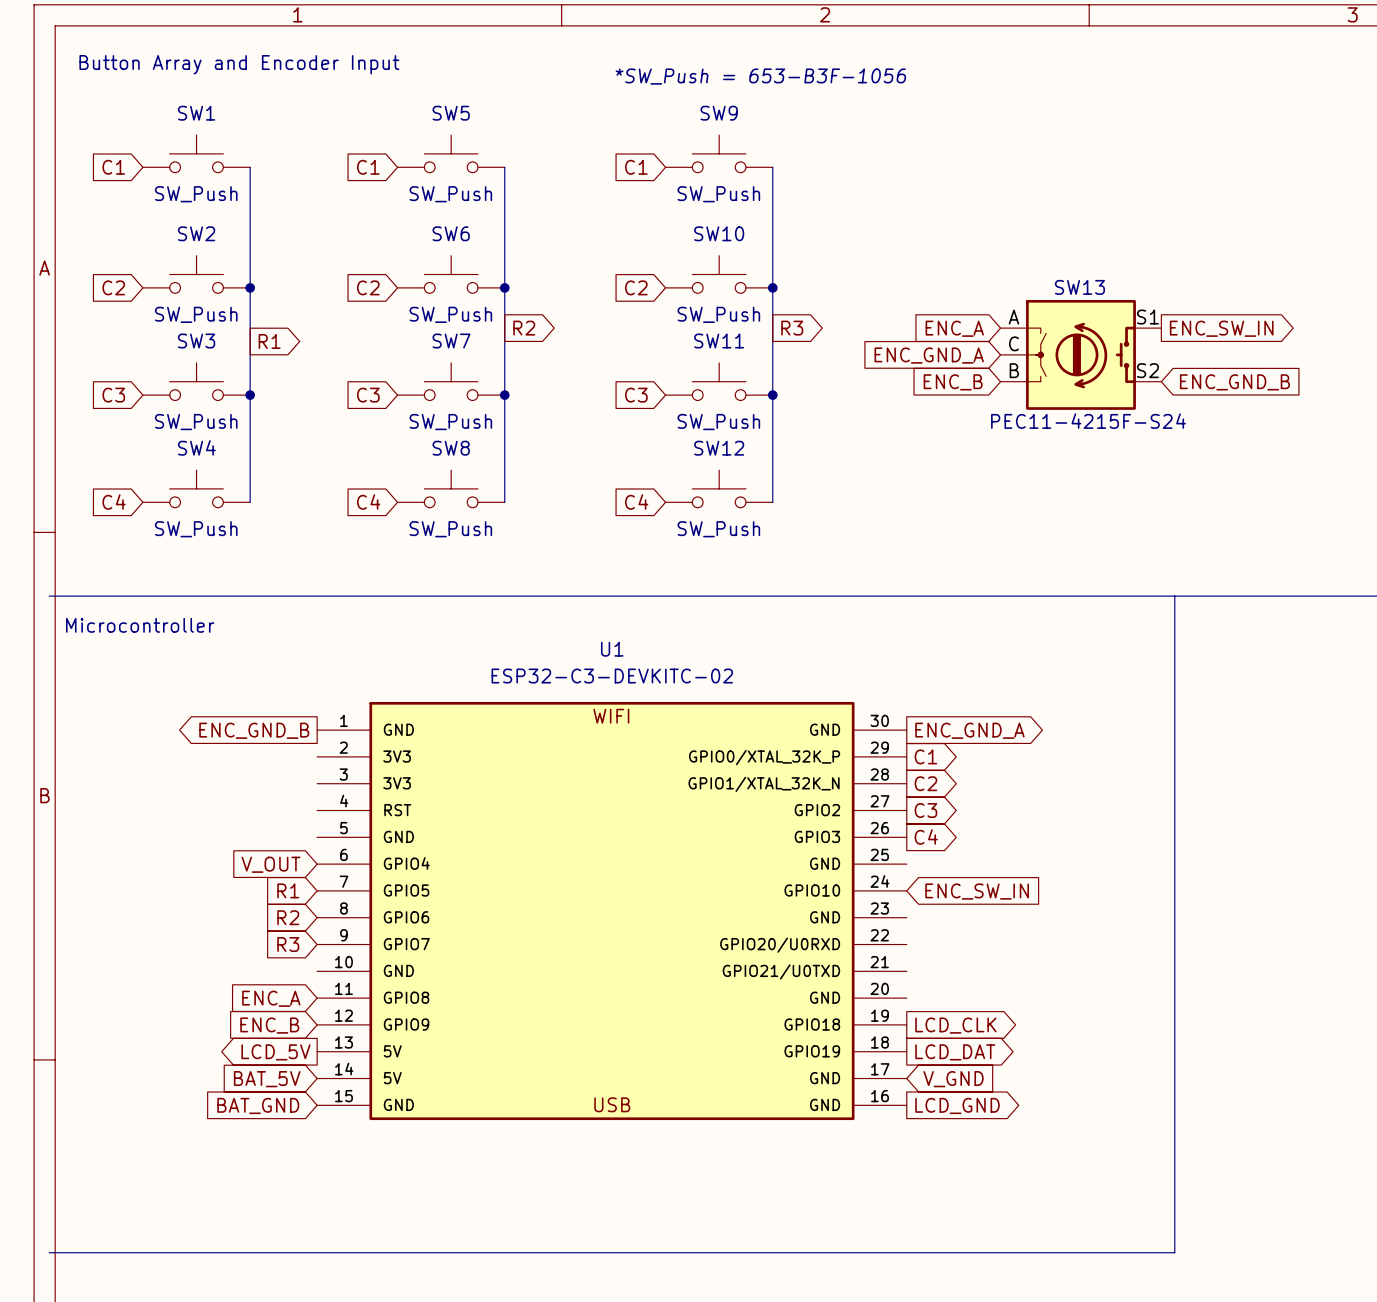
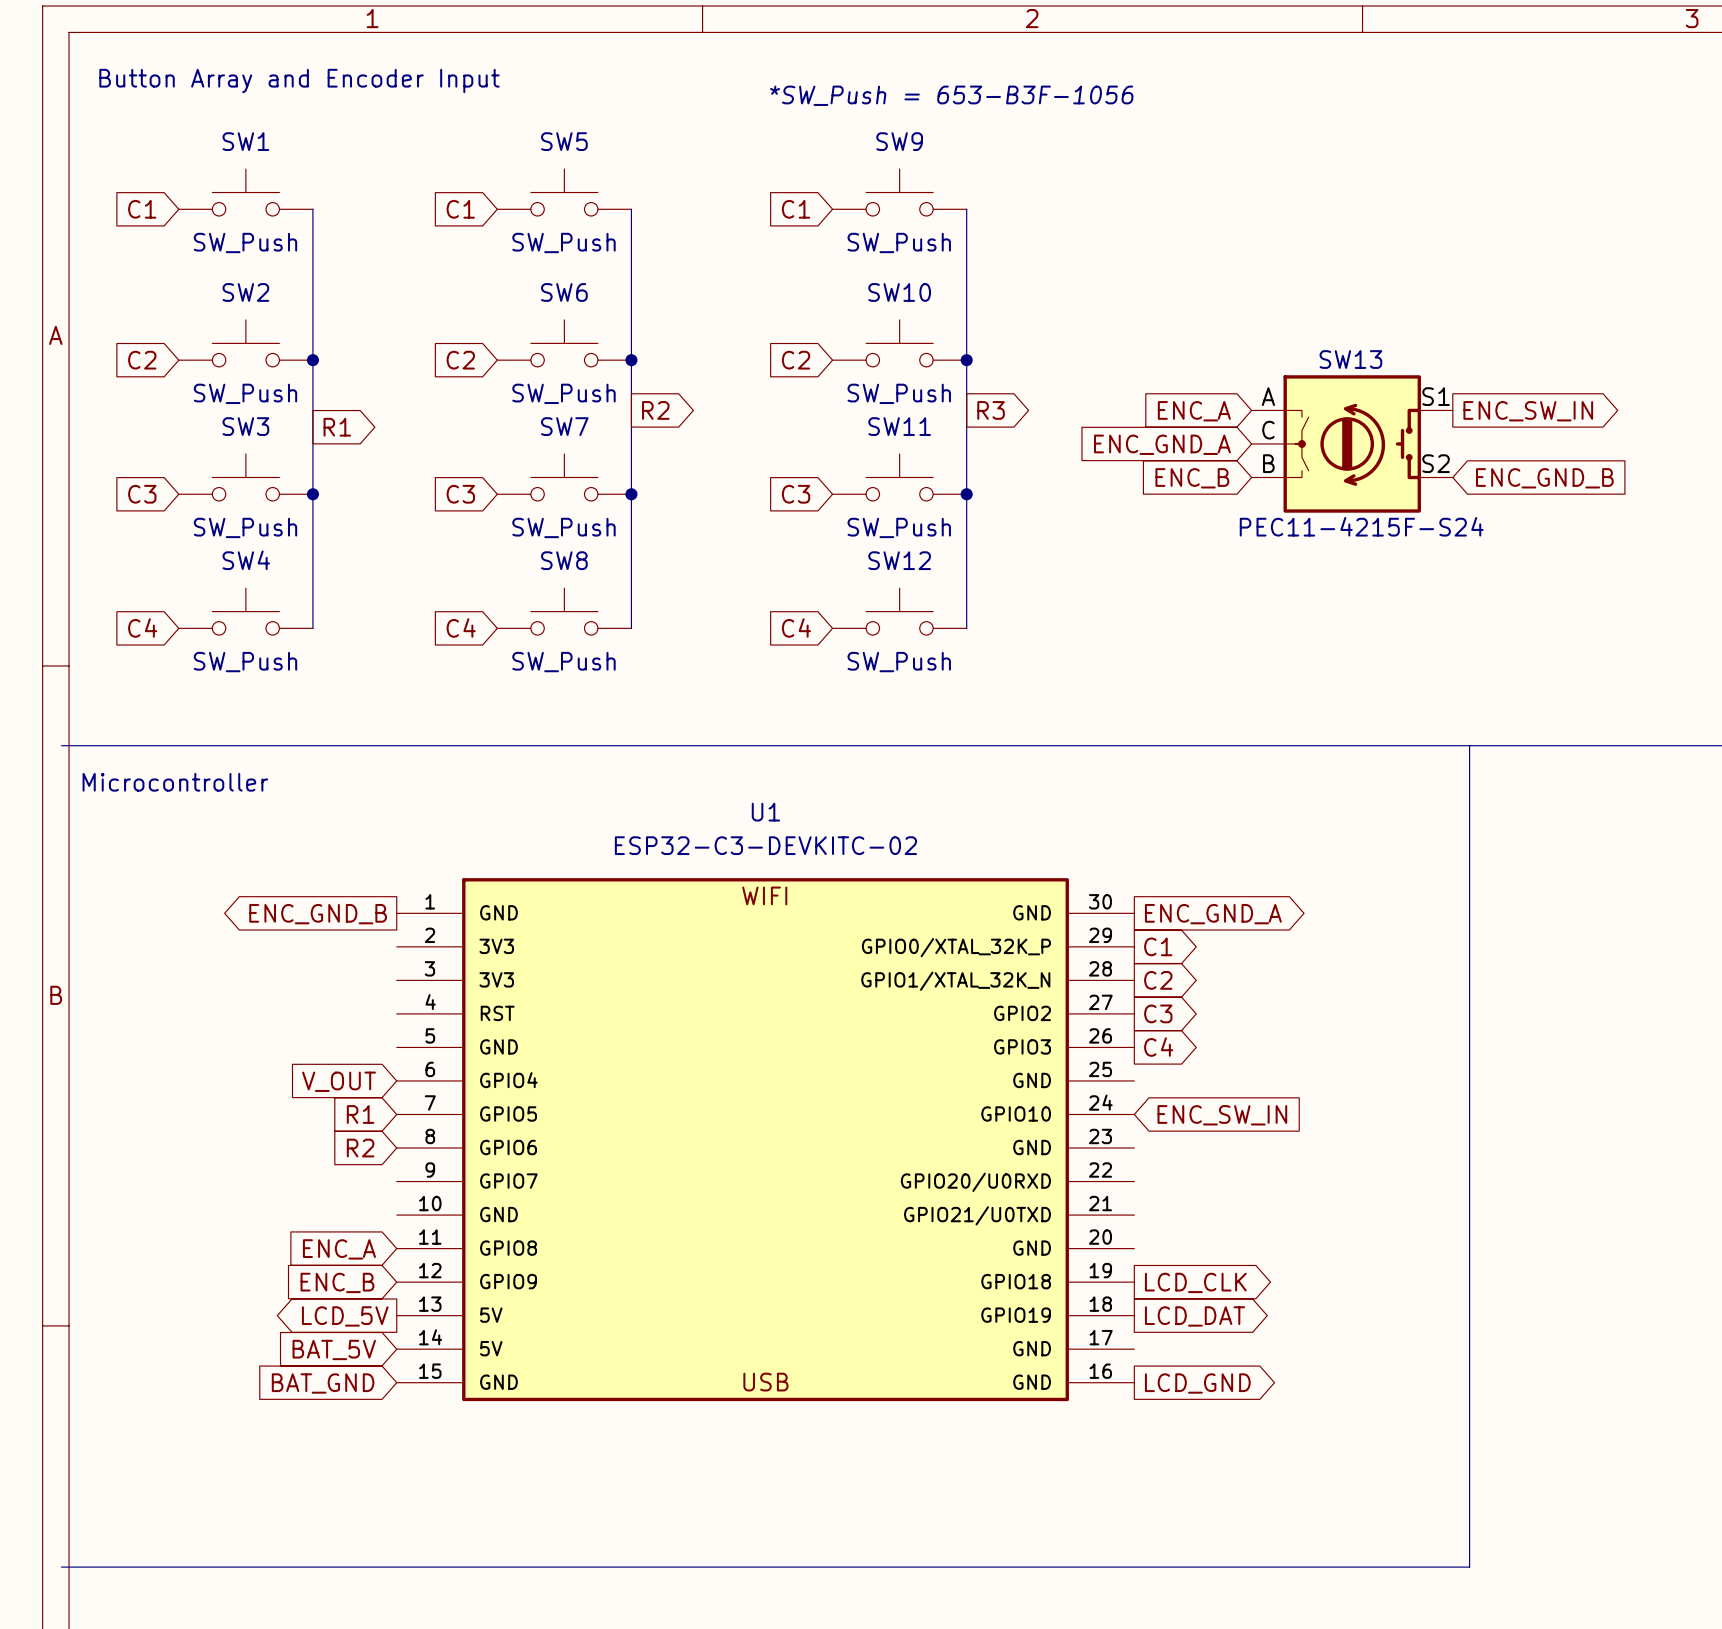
global label: R3 (288, 944) -> none
global label: V_GND (953, 1079) -> none

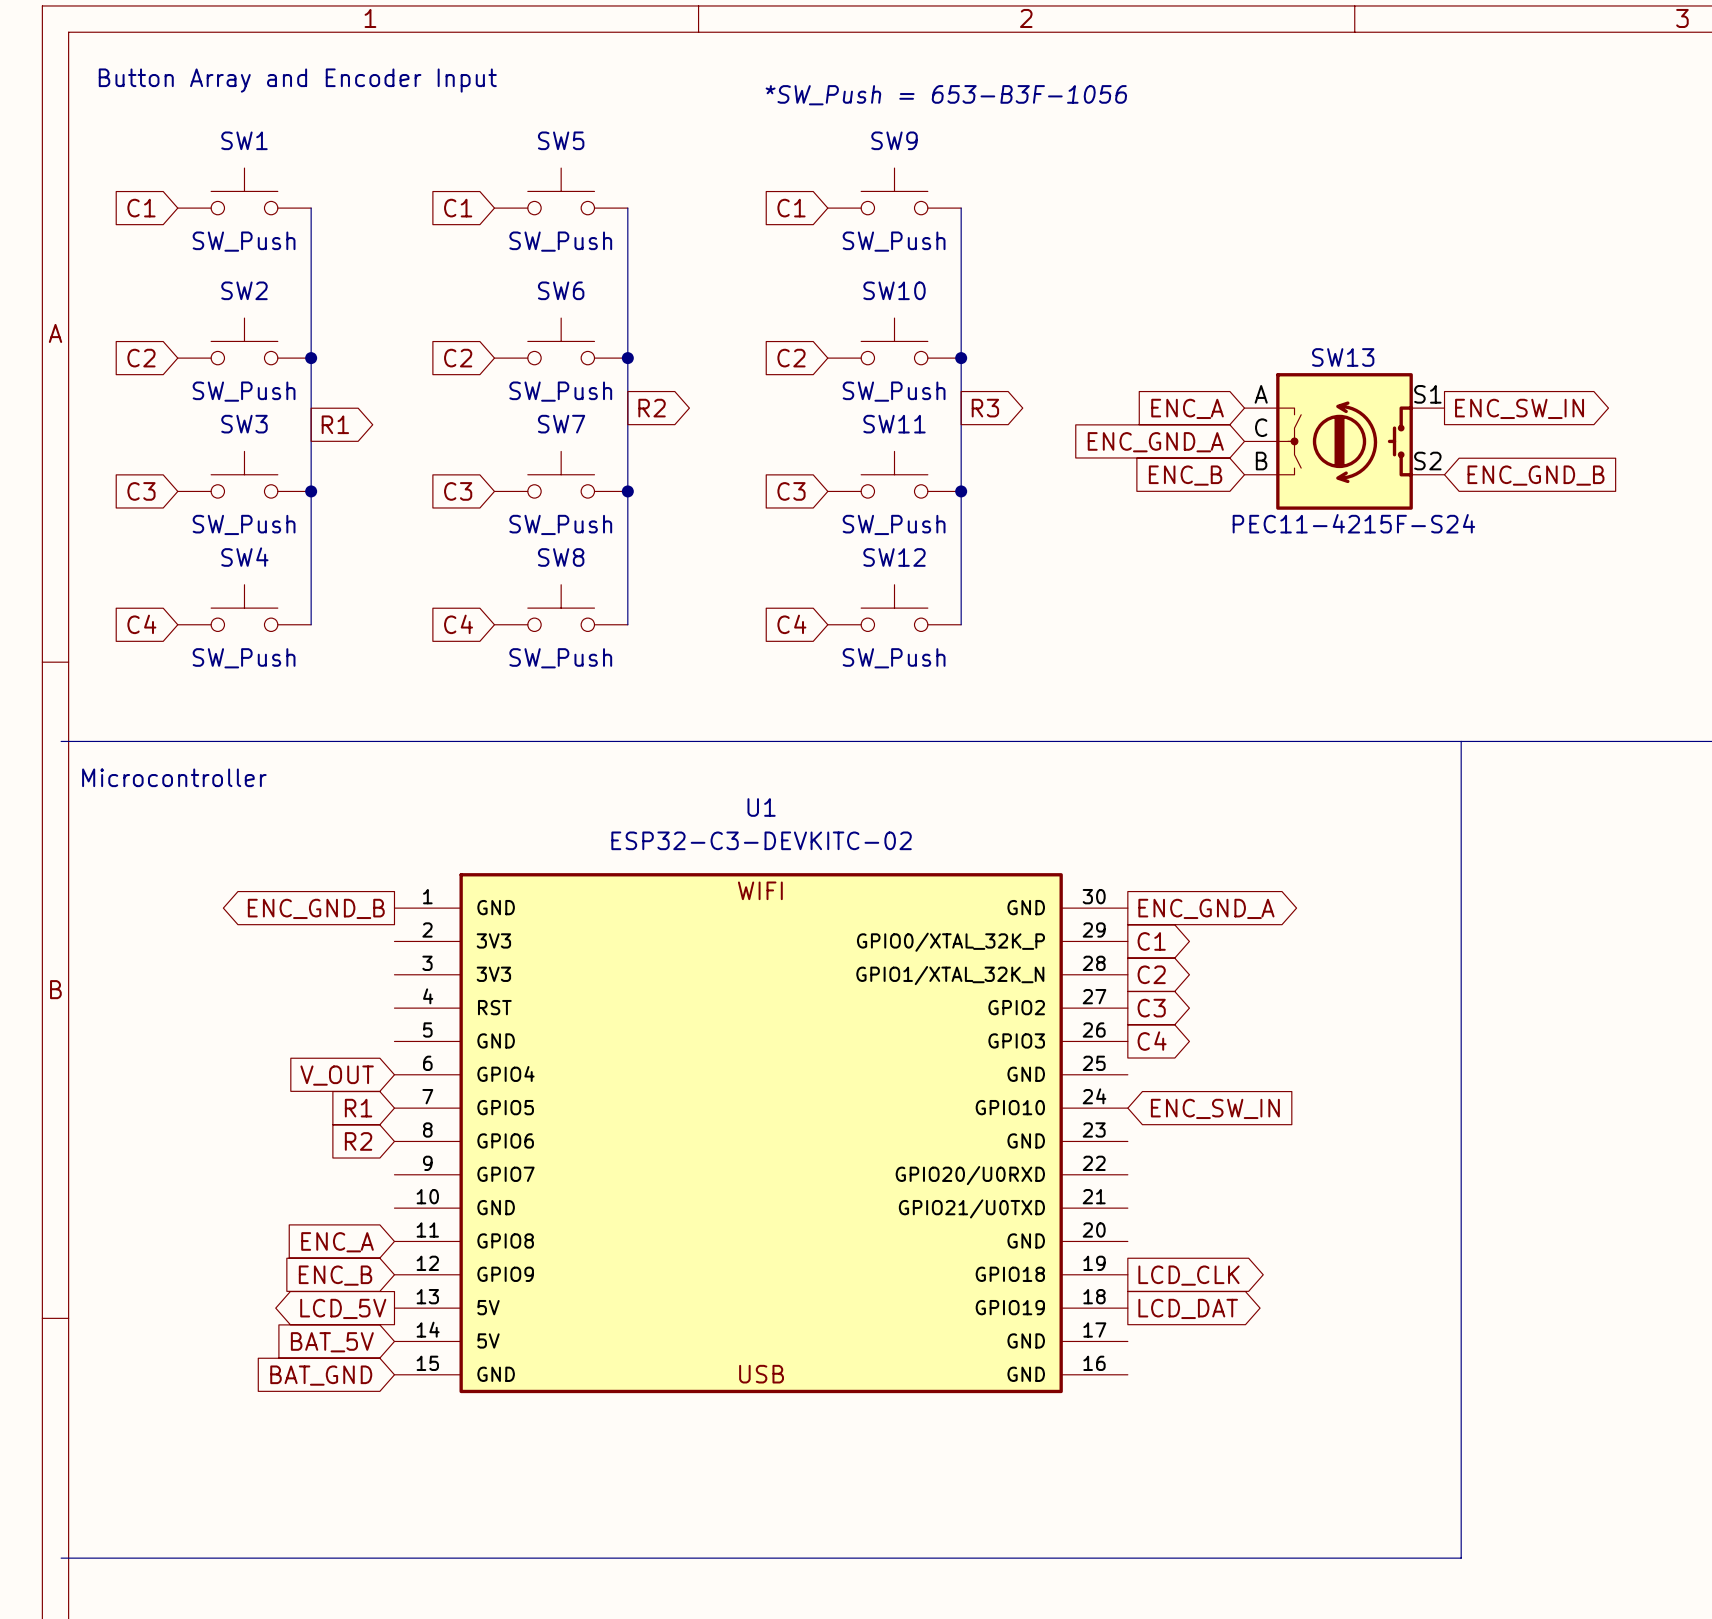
global label: LCD_GND (1197, 1383) -> none

